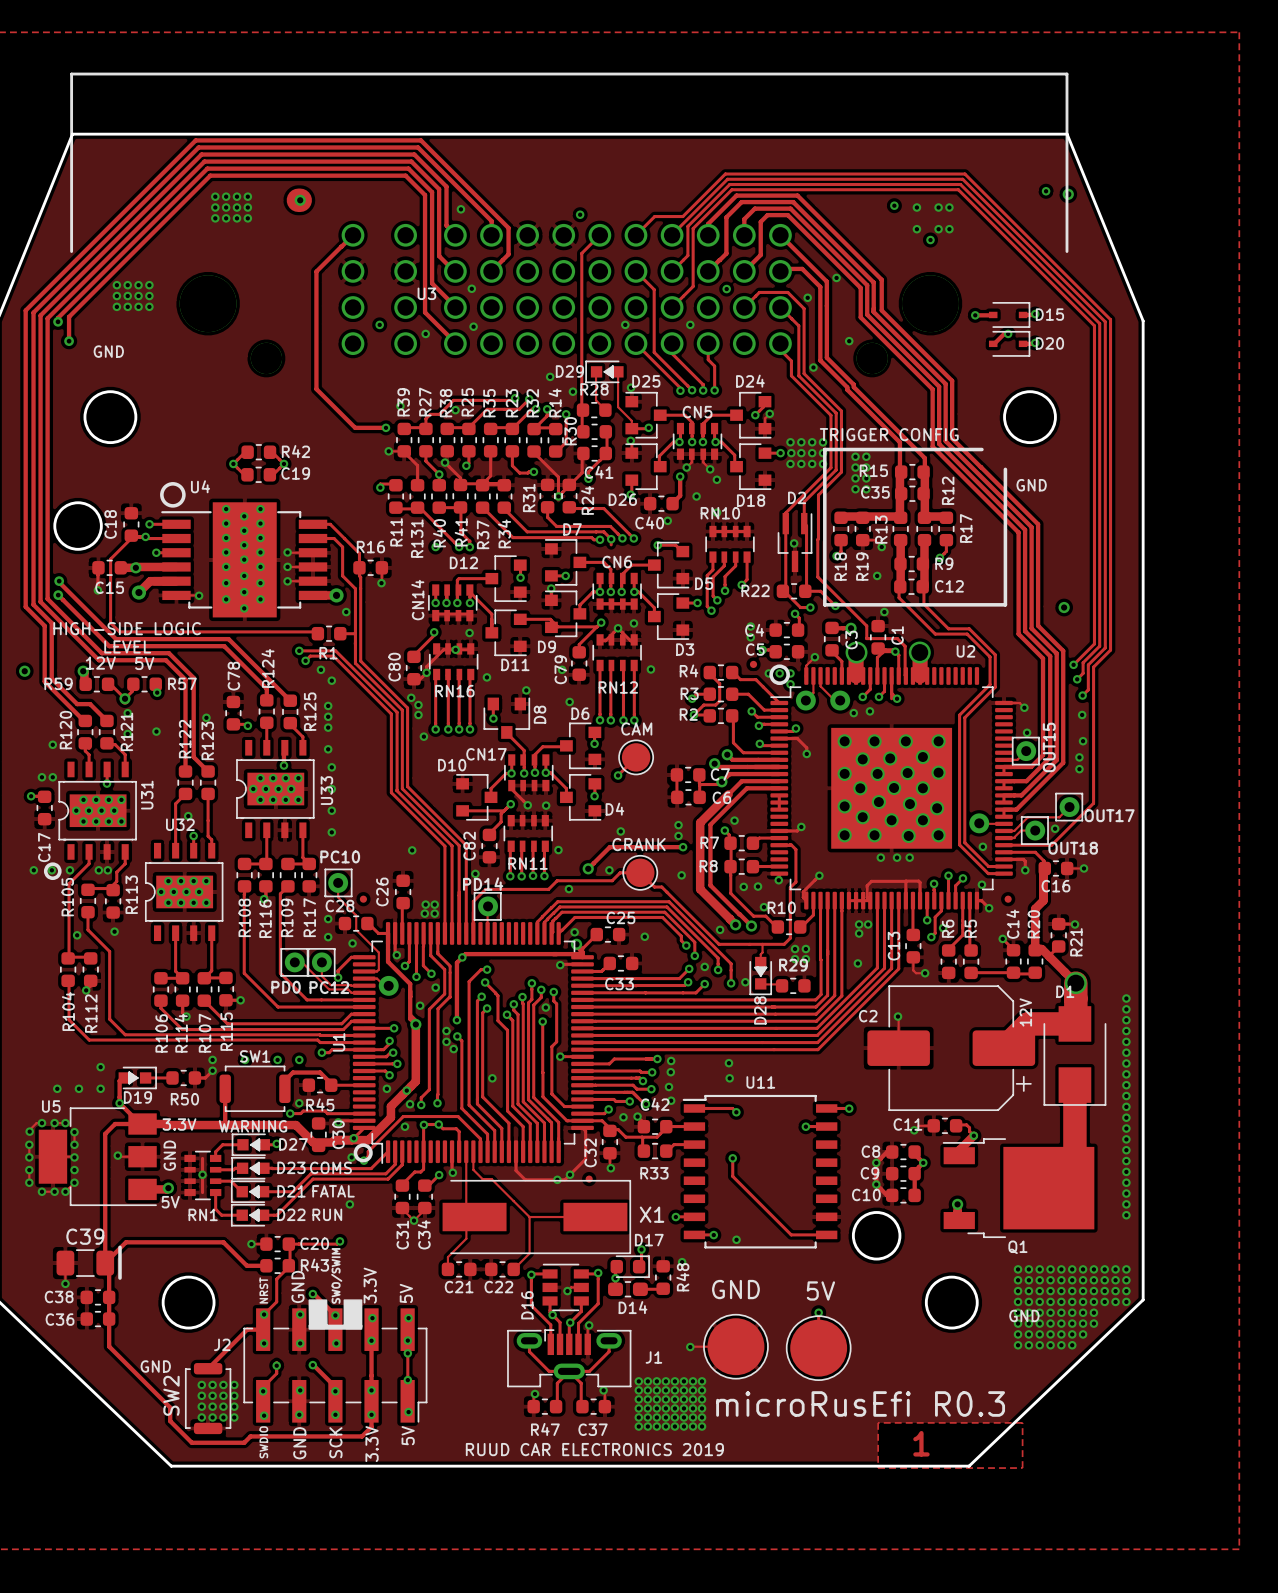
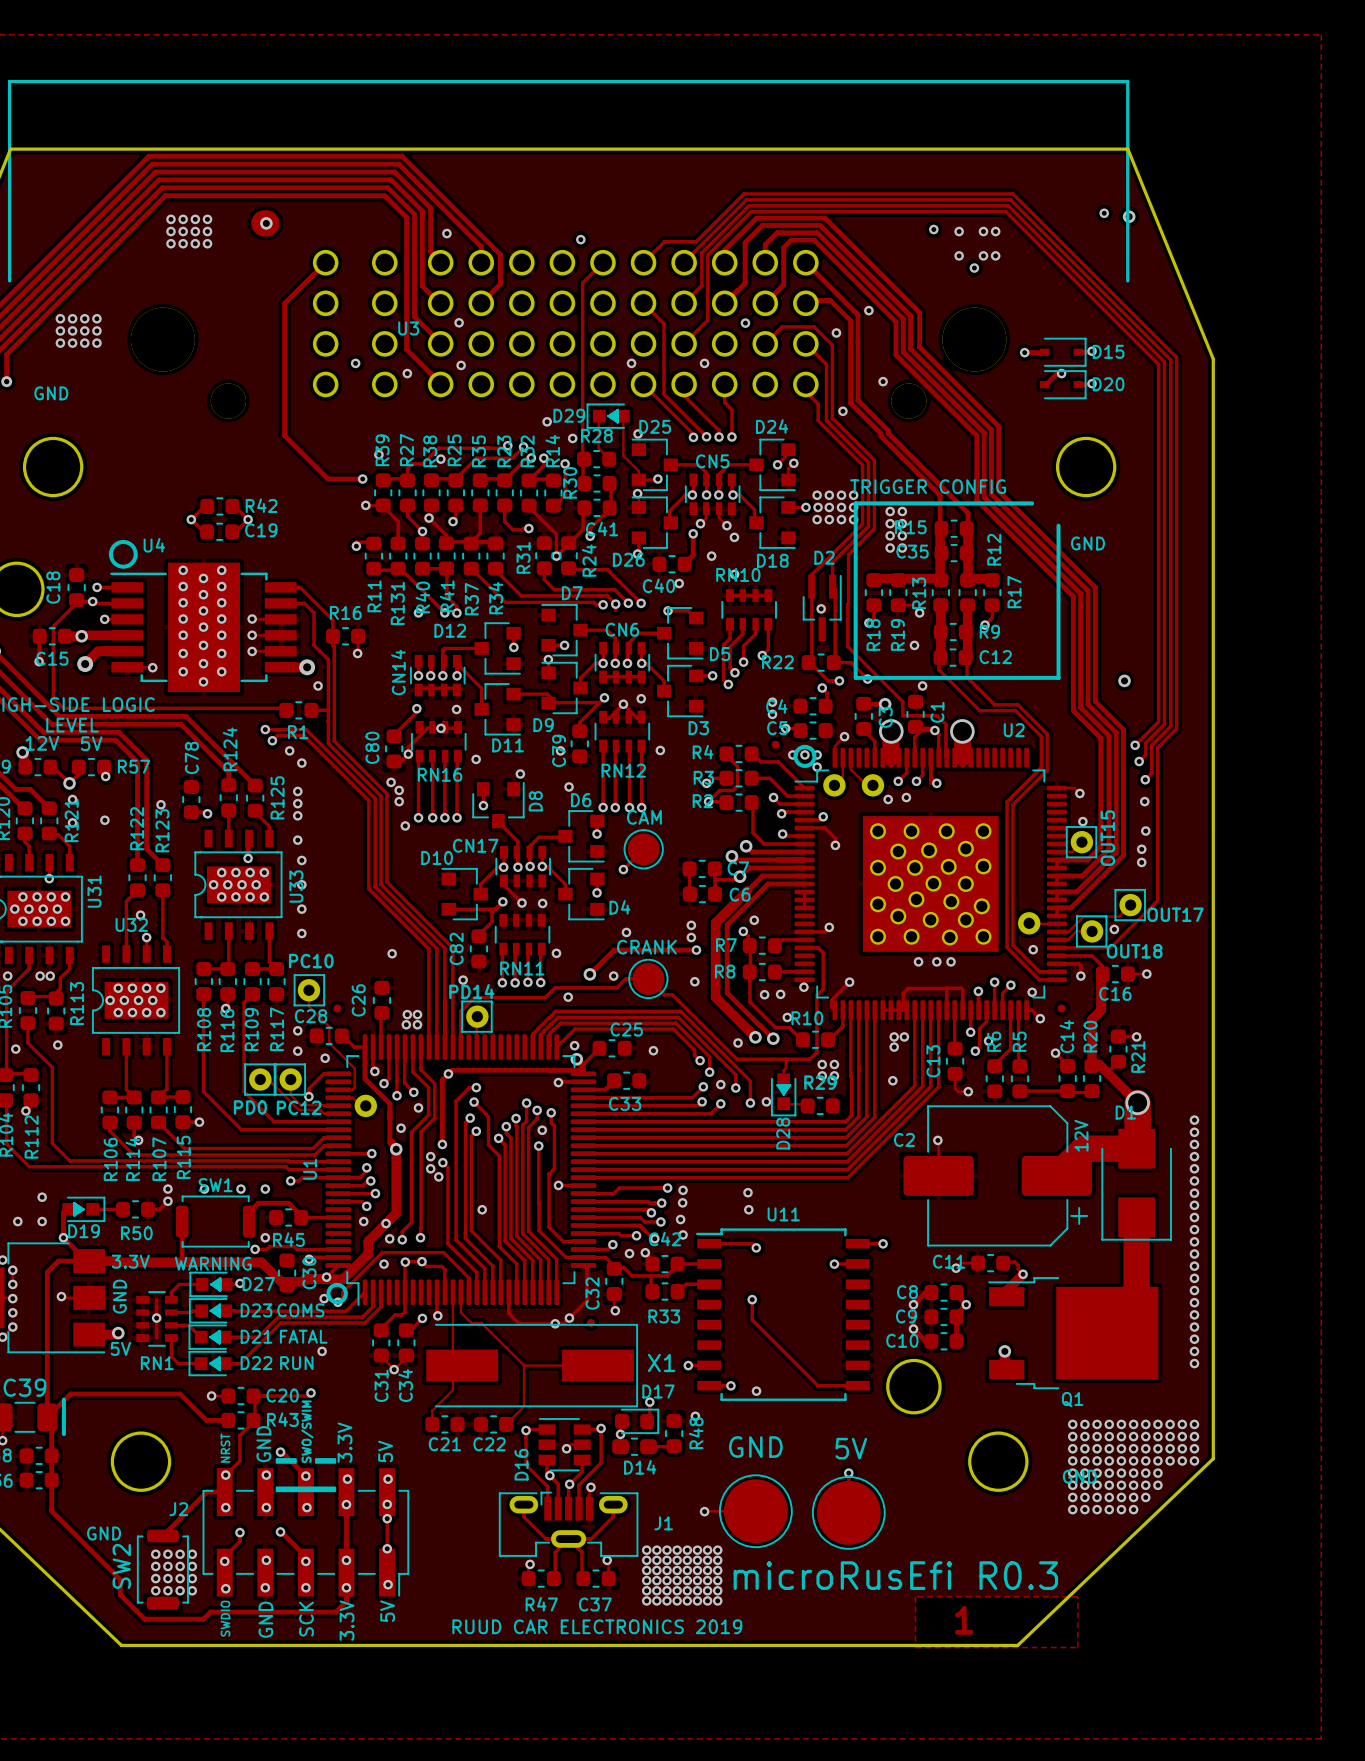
drawing shape: [308, 1299, 328, 1328] -> [275, 1458, 297, 1464]
drawing shape: [343, 1299, 363, 1328] -> [315, 1458, 337, 1464]

